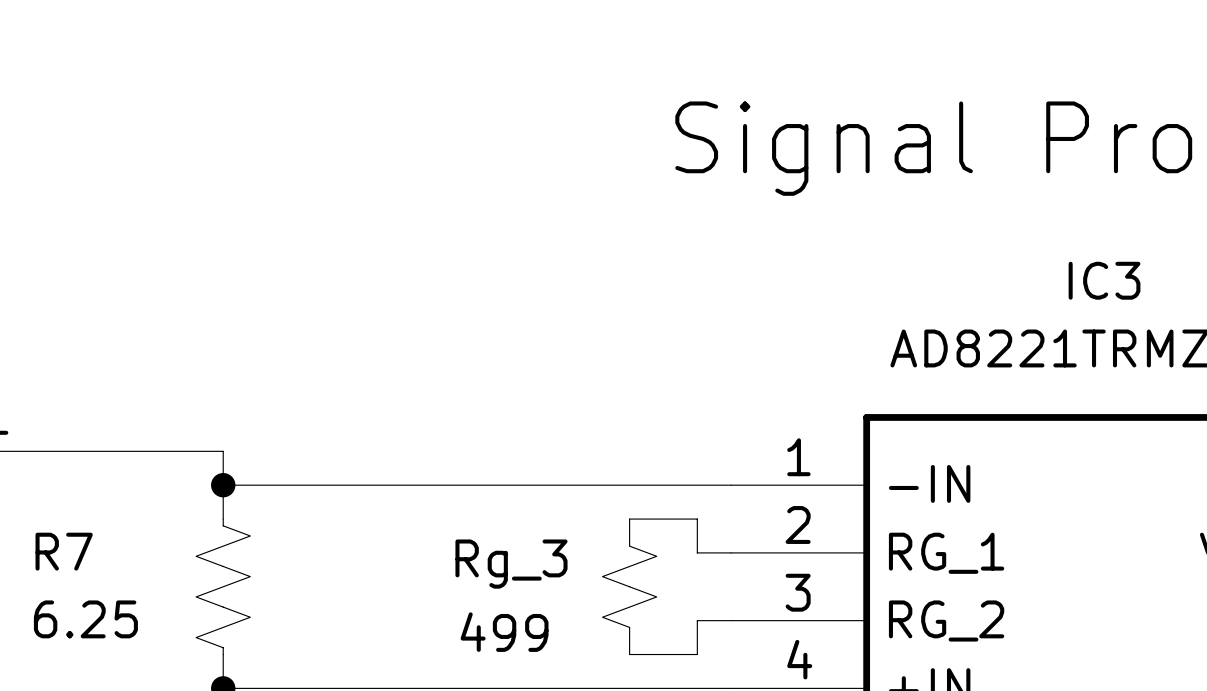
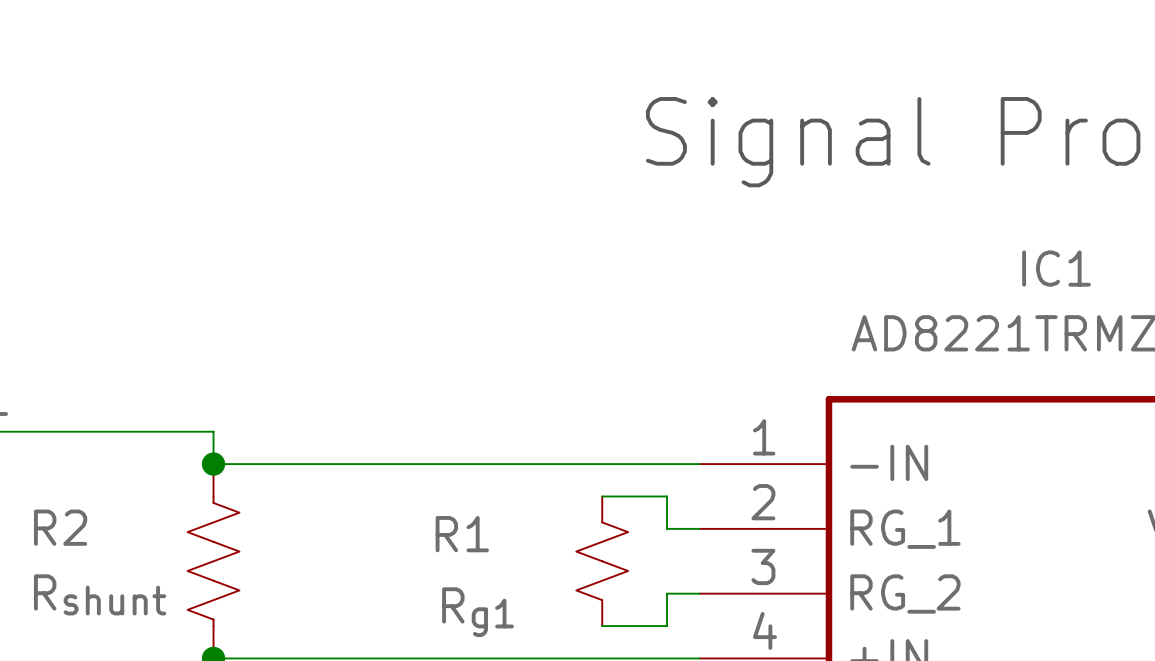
IC3 name: IC3 (1104, 280) -> IC1 (1056, 268)
R7 name: R7 (64, 551) -> R2 (60, 527)
Rg_3 name: Rg_3 (511, 564) -> R1 (462, 534)
R7 value: 6.25 (85, 619) -> Rshunt (100, 594)
Rg_3 value: 499 (504, 632) -> Rg1 (477, 612)

